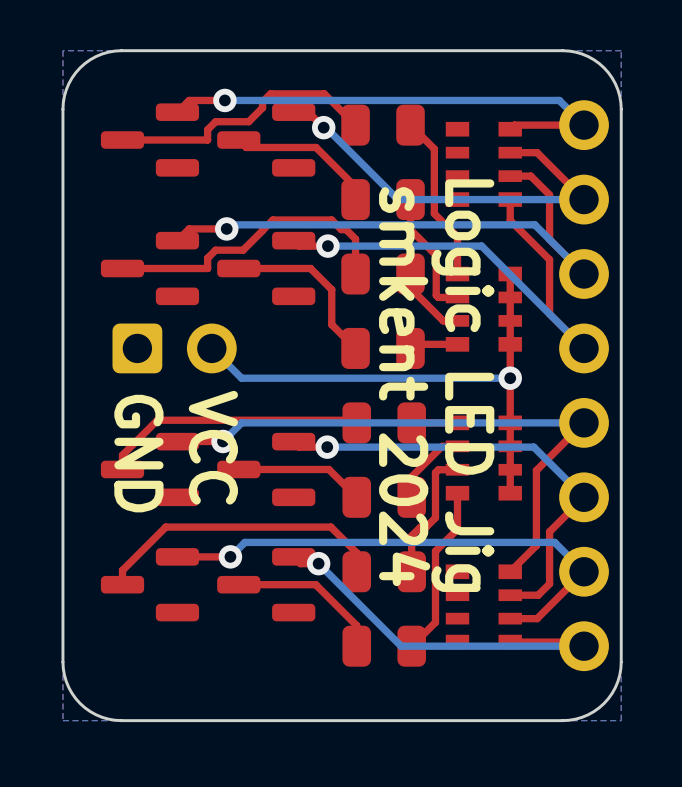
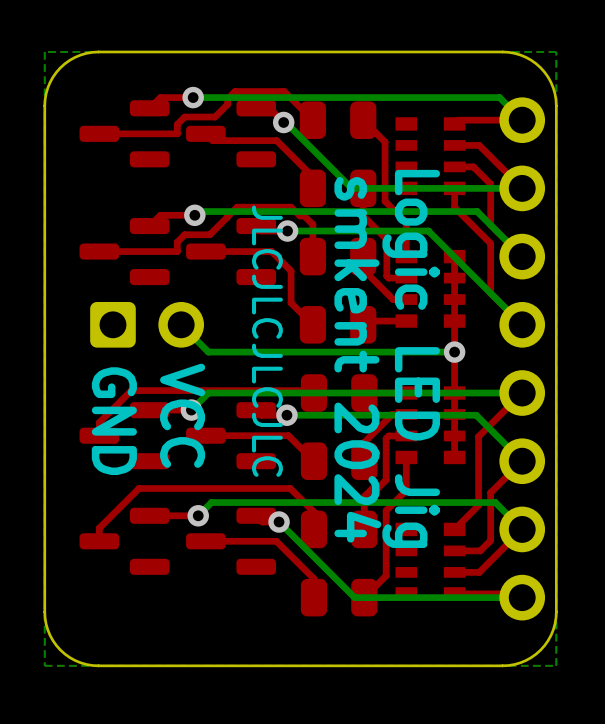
text: none -> JLCJLCJLCJLC (267, 341)

